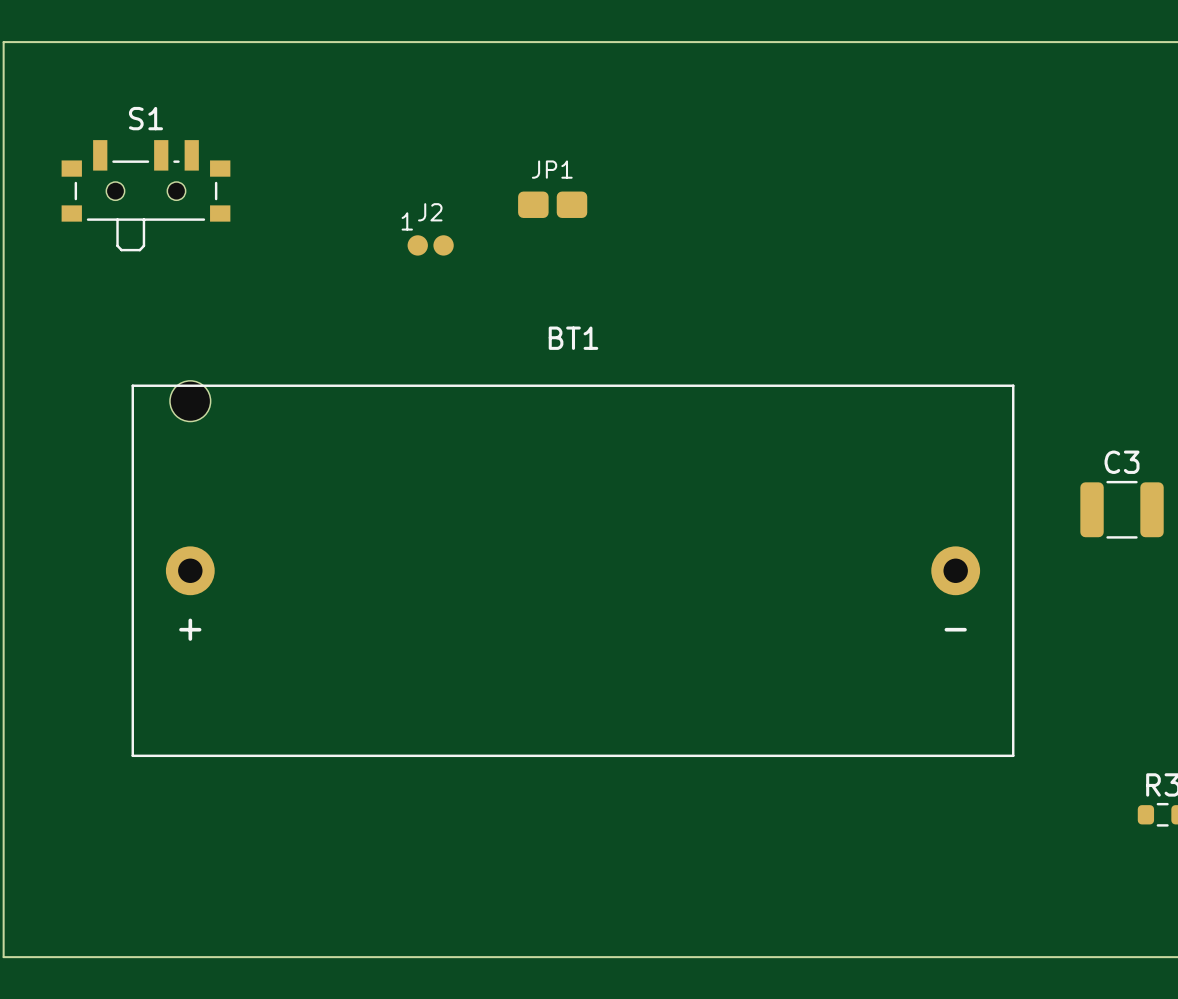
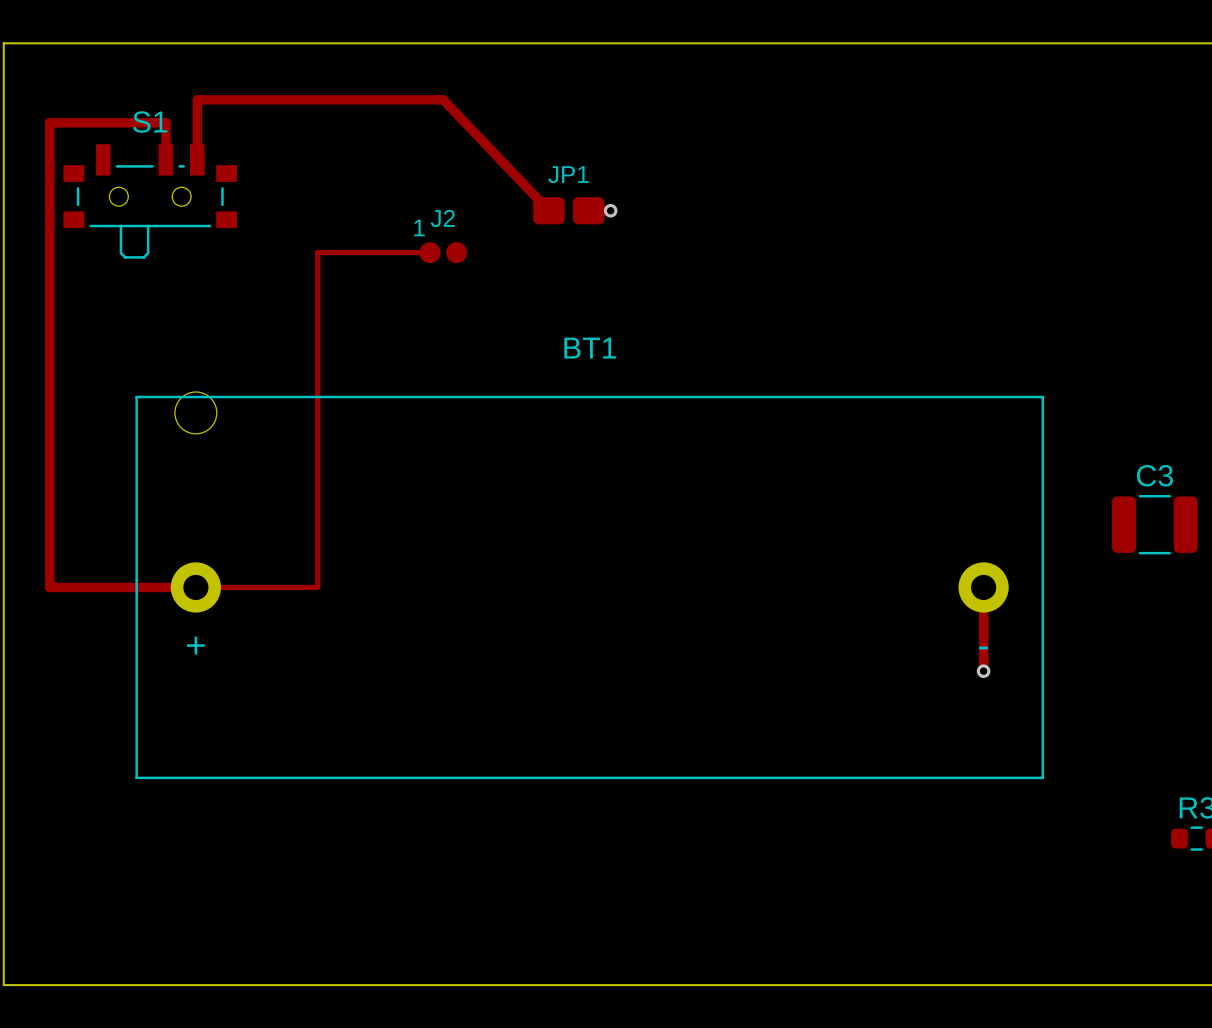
track: none -> (165, 159) (165, 122) (49, 122) (49, 587) (317, 587) (317, 252) (429, 252)
track: none -> (197, 159) (197, 99) (443, 99) (548, 210)
via: none -> (610, 210)
track: none -> (983, 587) (983, 671)
via: none -> (983, 671)

